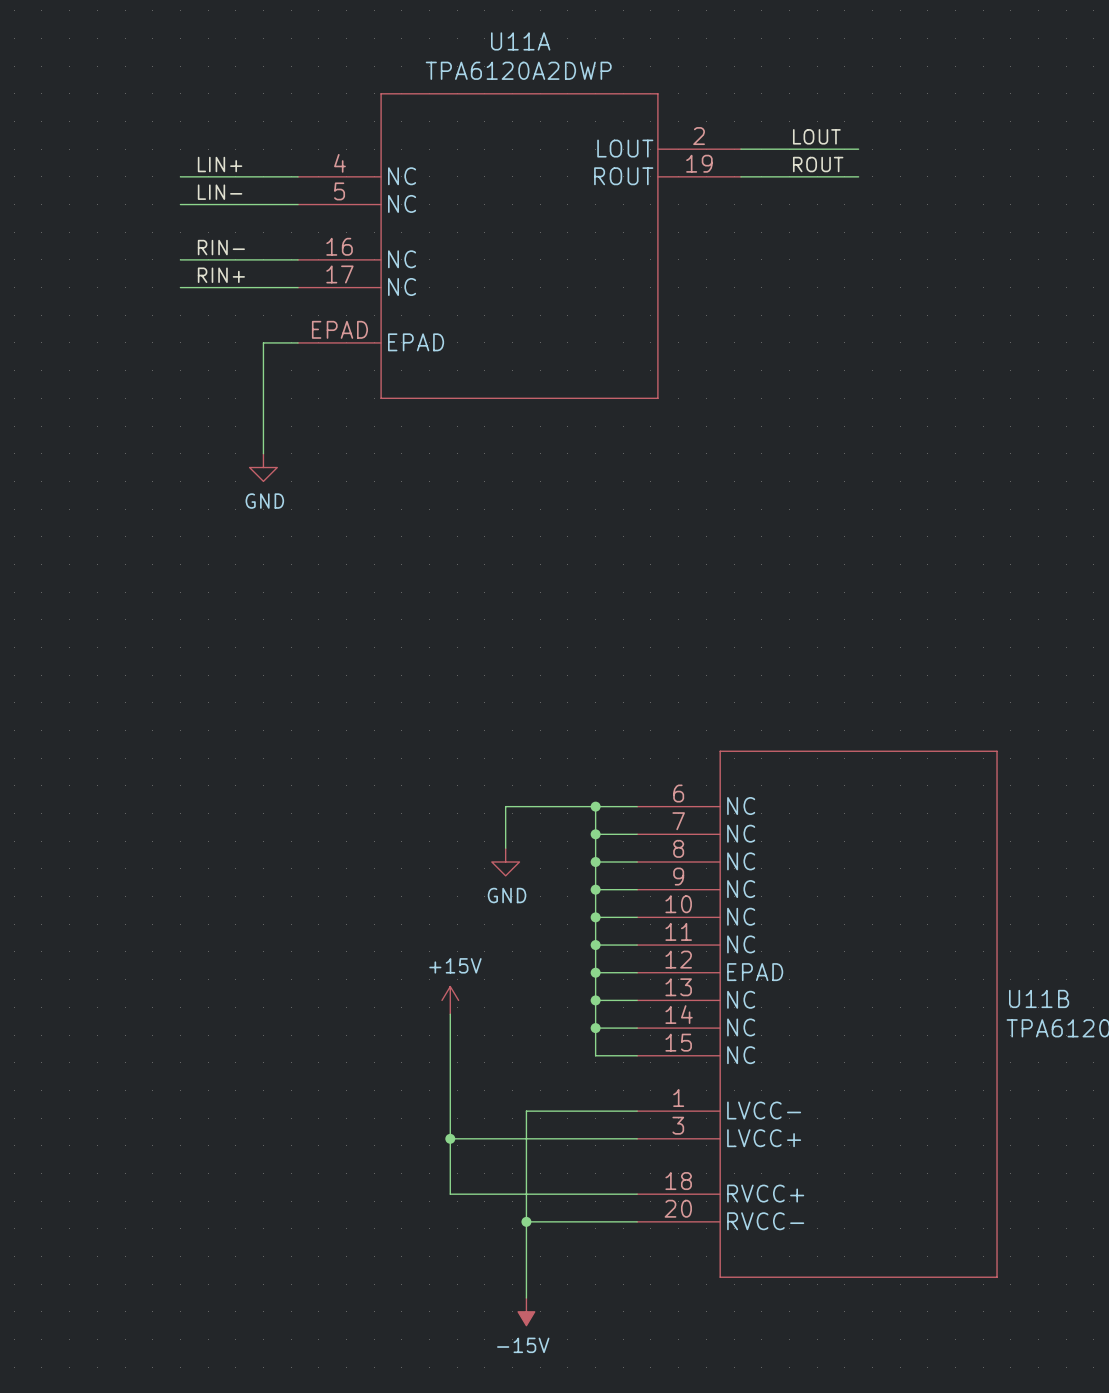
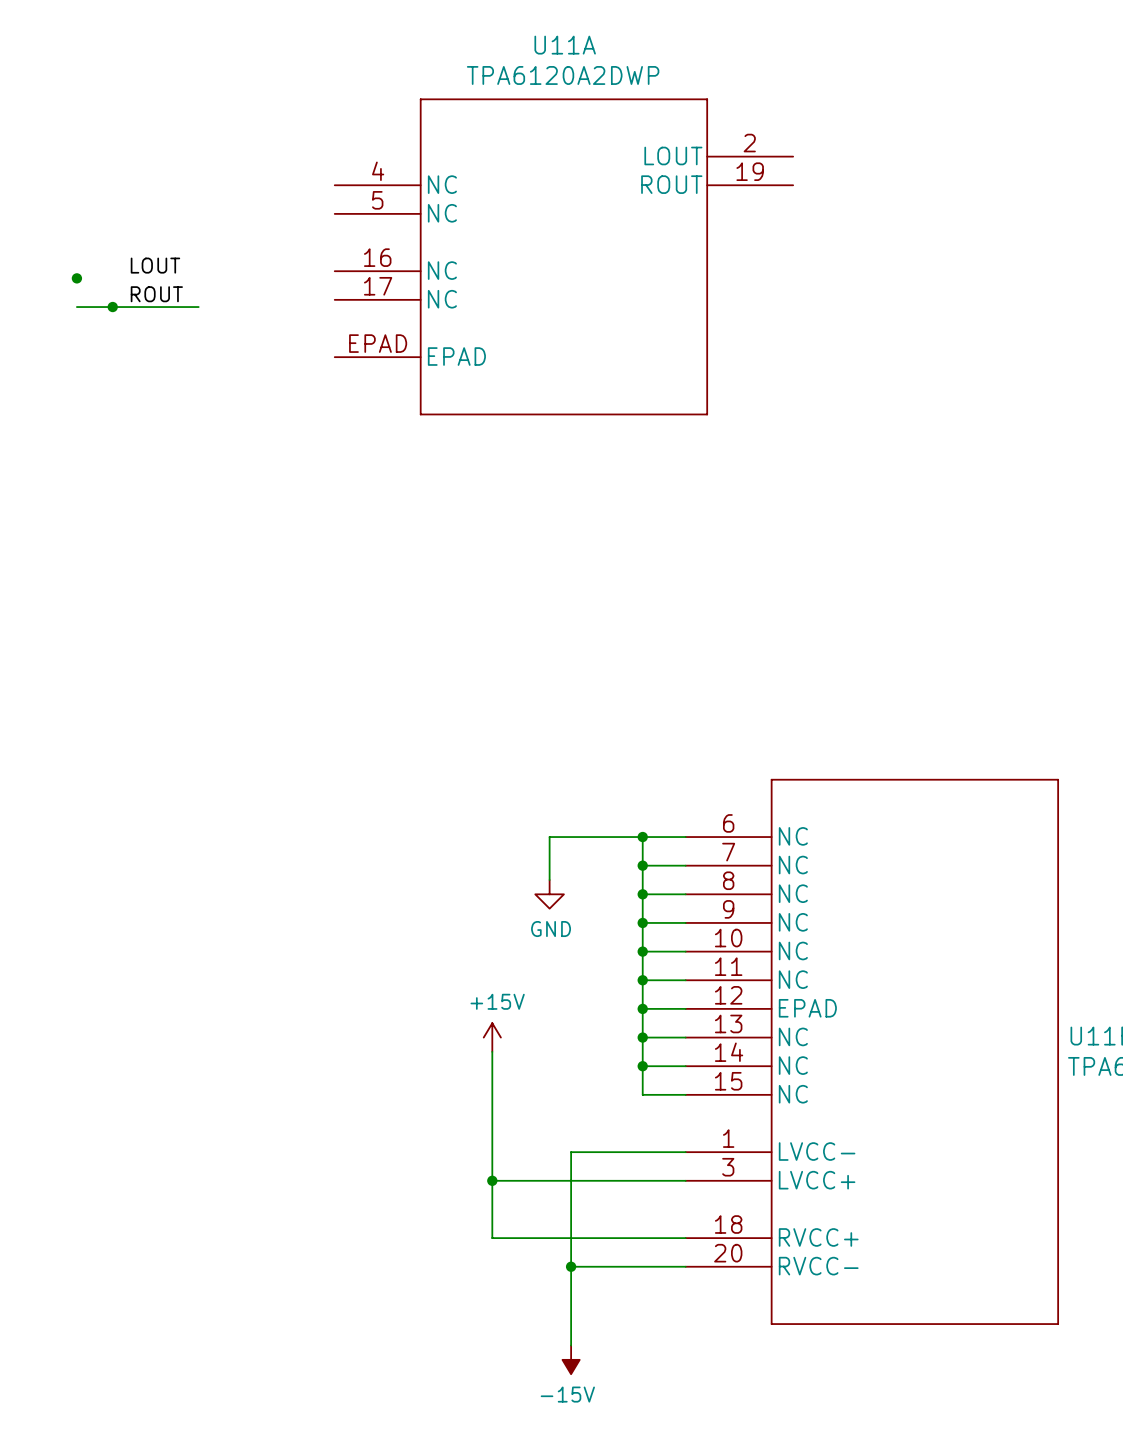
label: LOUT (816, 136) -> none
wire: (740, 149) (858, 149) -> none
label: LIN+ (220, 164) -> none
label: ROUT (818, 164) -> none
wire: (180, 176) (298, 176) -> none
wire: (740, 176) (858, 176) -> none
label: LIN- (220, 192) -> none
wire: (180, 204) (298, 204) -> none
label: RIN- (221, 247) -> none
label: none -> LOUT (155, 265)
wire: (180, 259) (298, 259) -> none
junction: none -> (76, 278)
label: RIN+ (221, 275) -> none
label: none -> ROUT (156, 294)
wire: (180, 287) (298, 287) -> (76, 307) (198, 307)
junction: none -> (112, 307)
wire: (298, 342) (263, 342) (263, 453) -> none
power symbol: GND (263, 467) -> none

